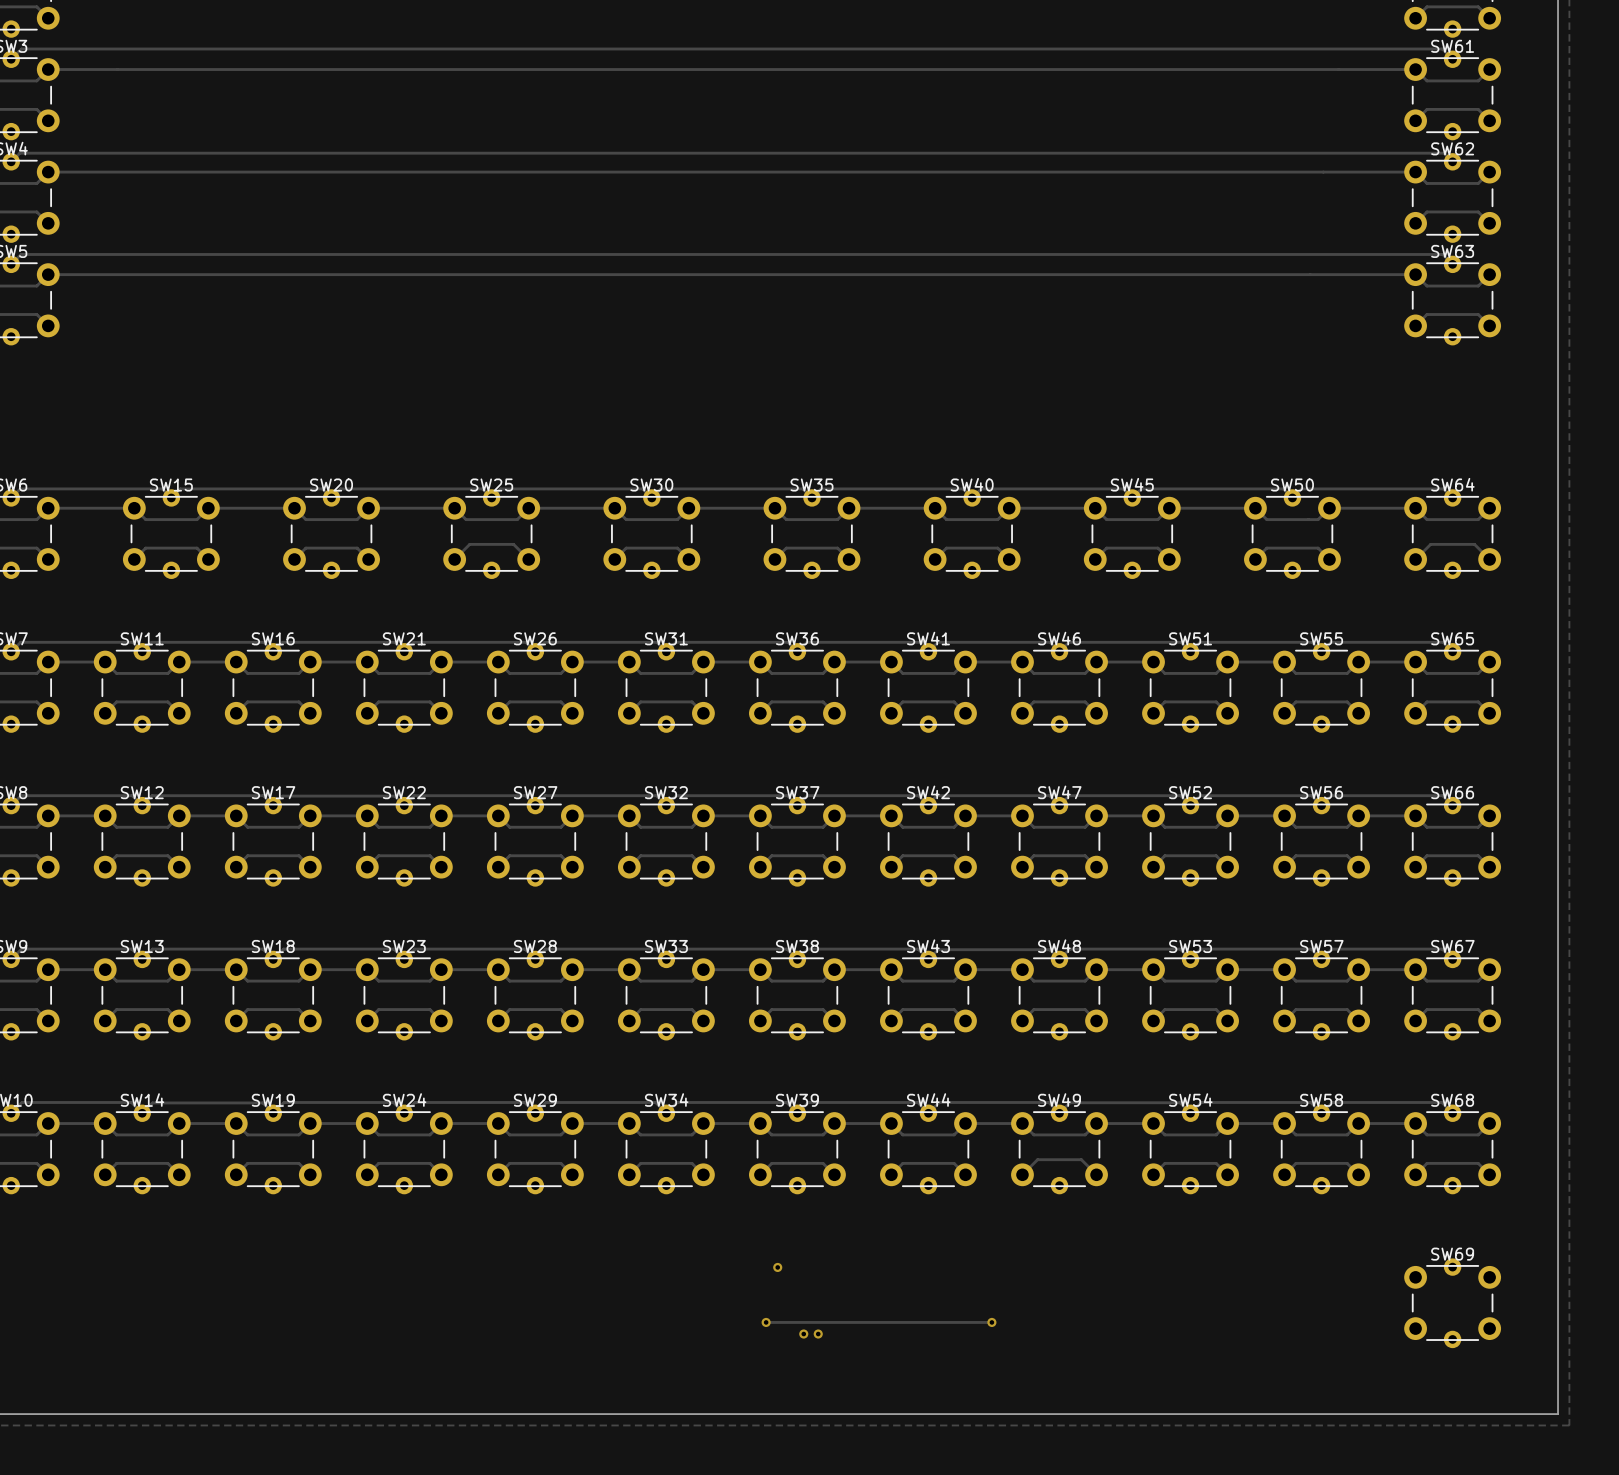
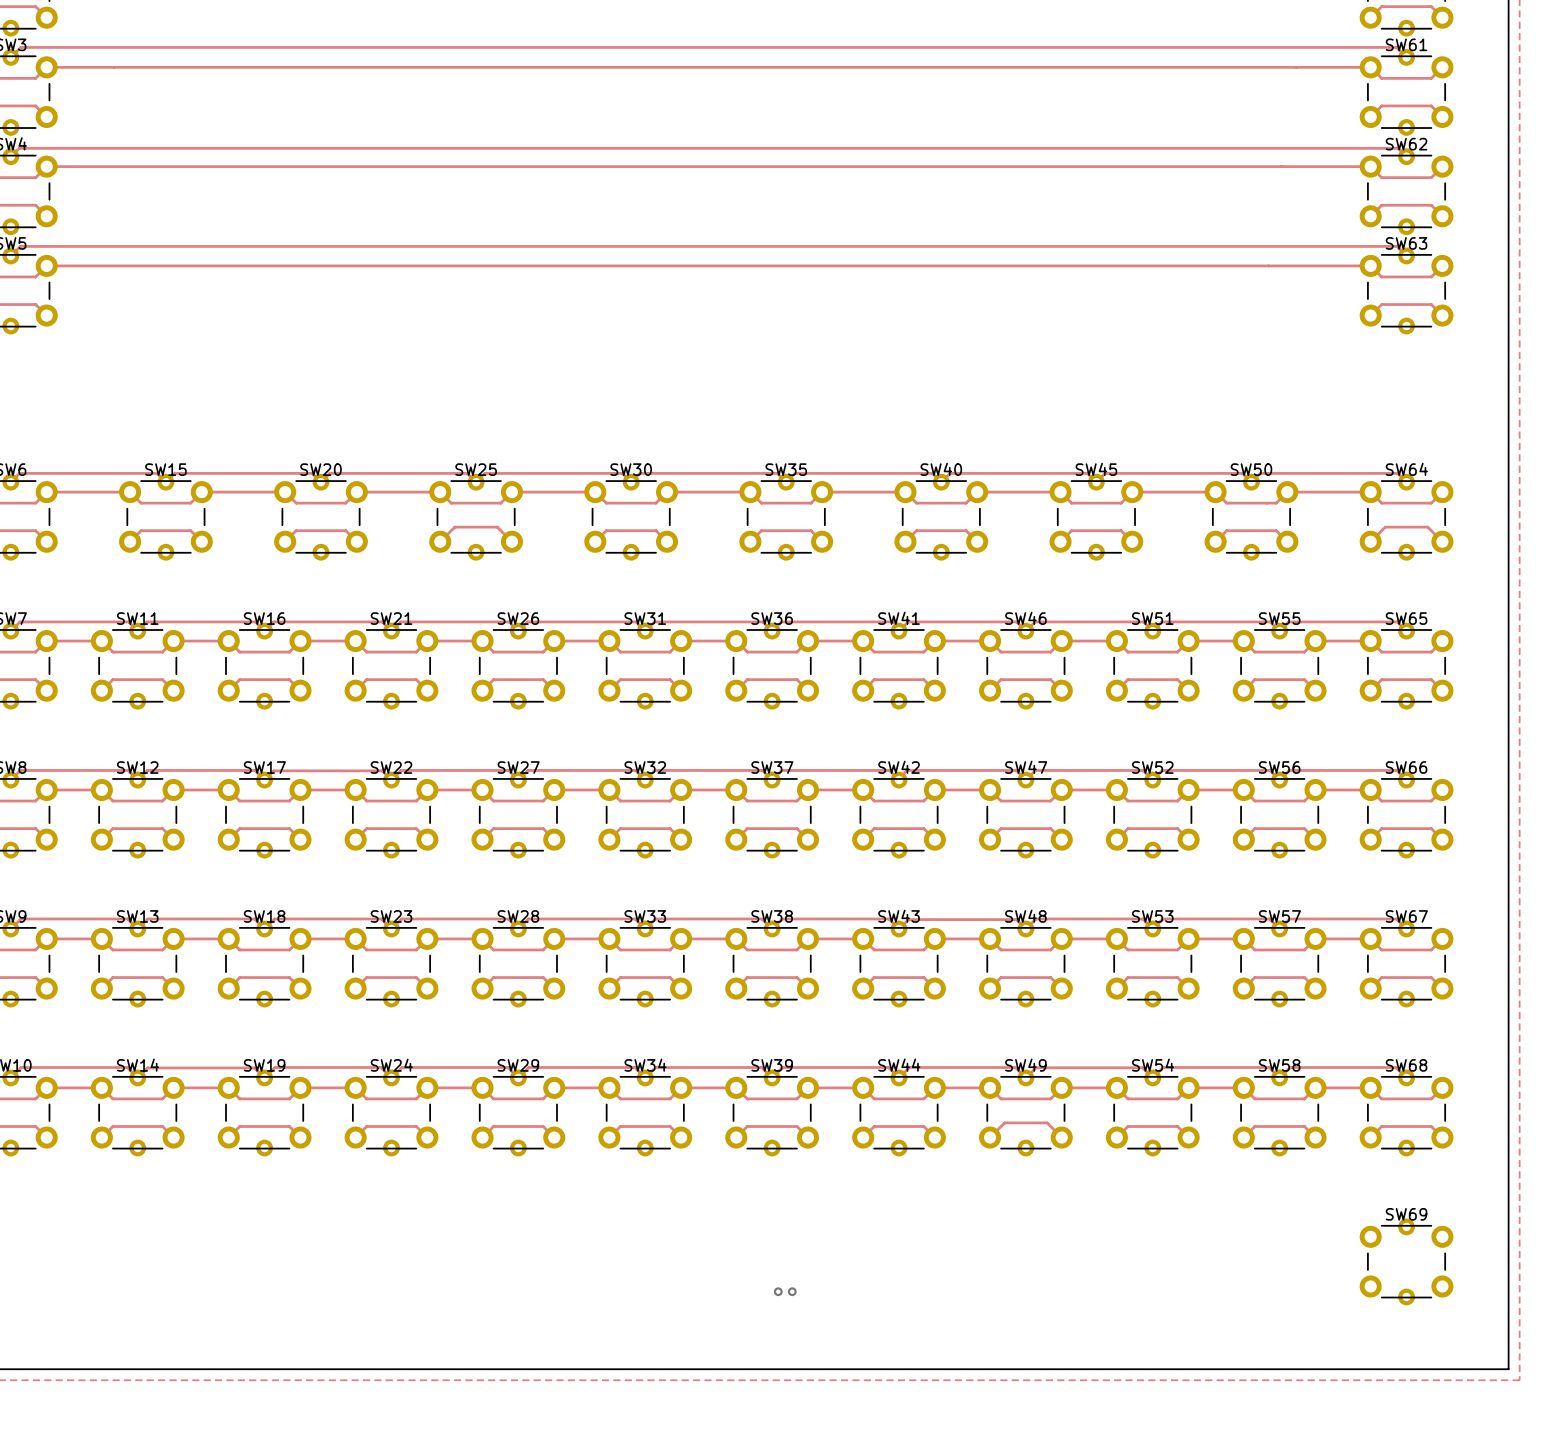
via: (777, 1267) -> none
track: (766, 1322) (991, 1322) -> none
via: (766, 1322) -> none
via: (991, 1322) -> none

